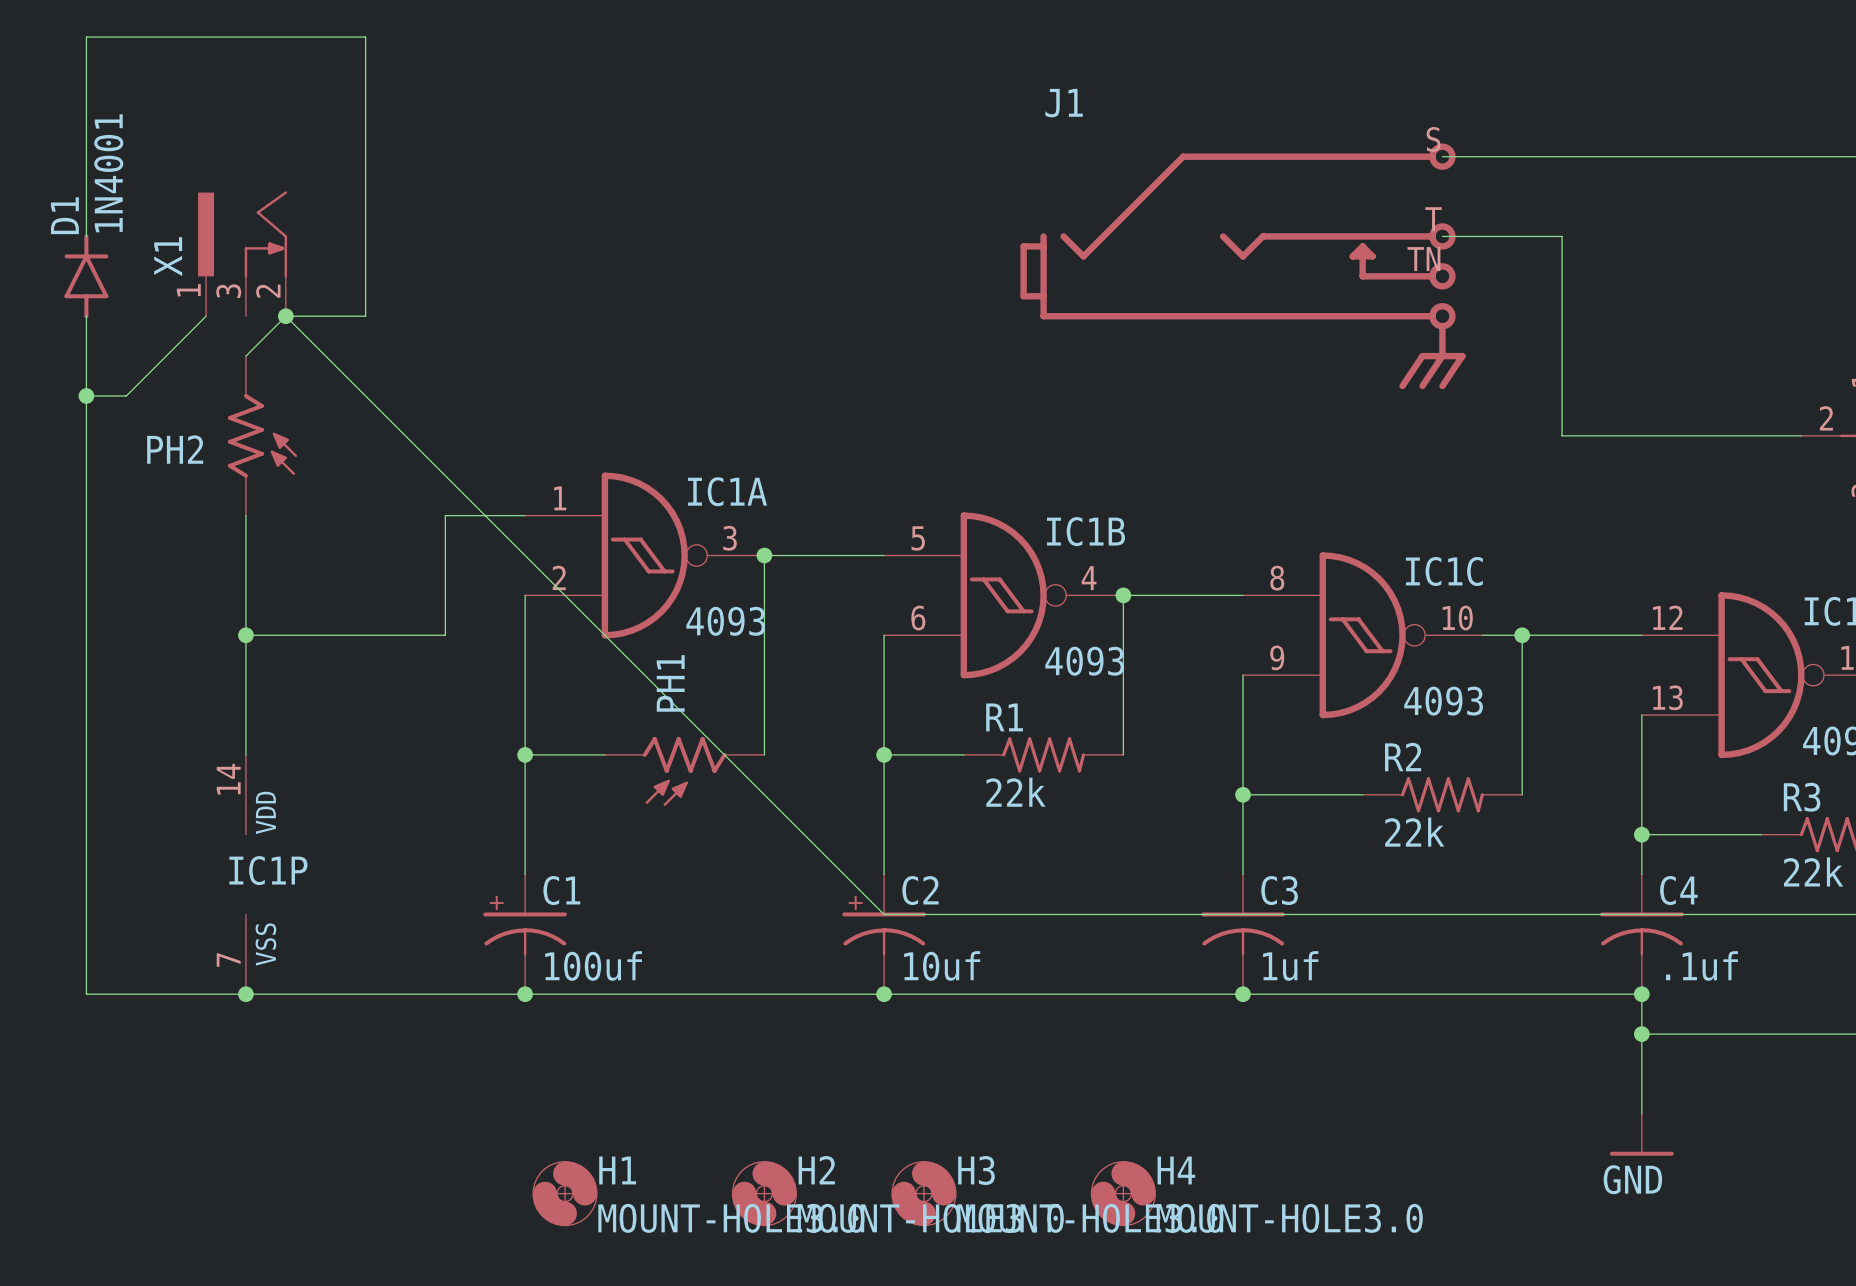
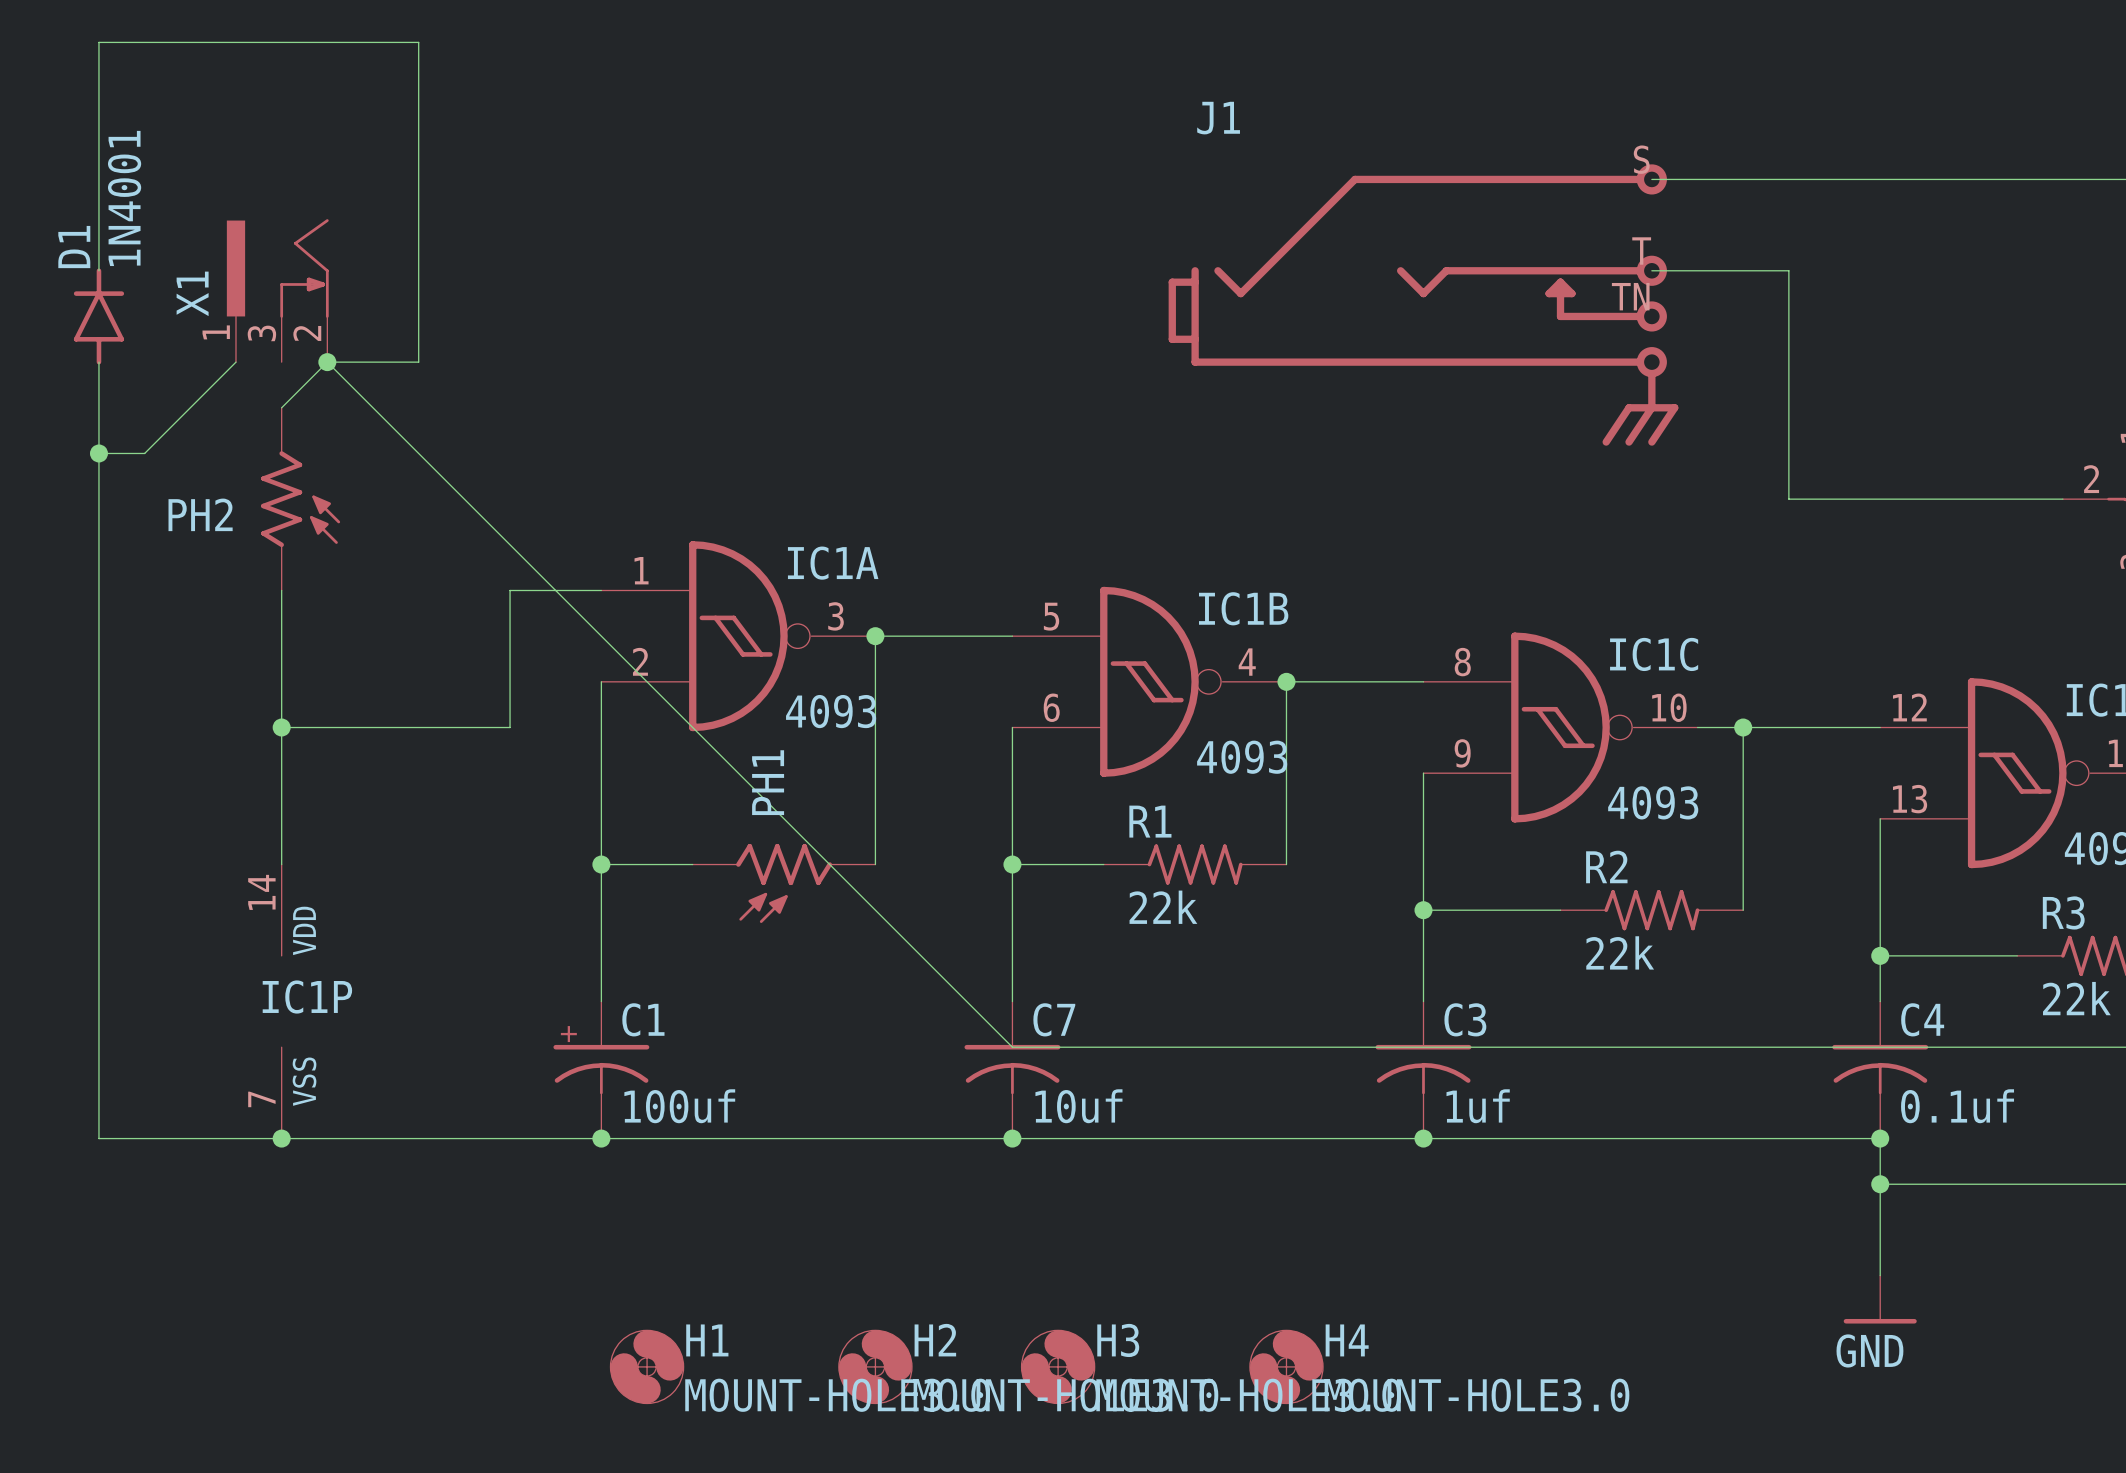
C2: 10uf (884, 934) -> none
C7: none -> 10uf (1012, 1070)
C4 value: .1uf (1701, 965) -> 0.1uf (1957, 1106)

